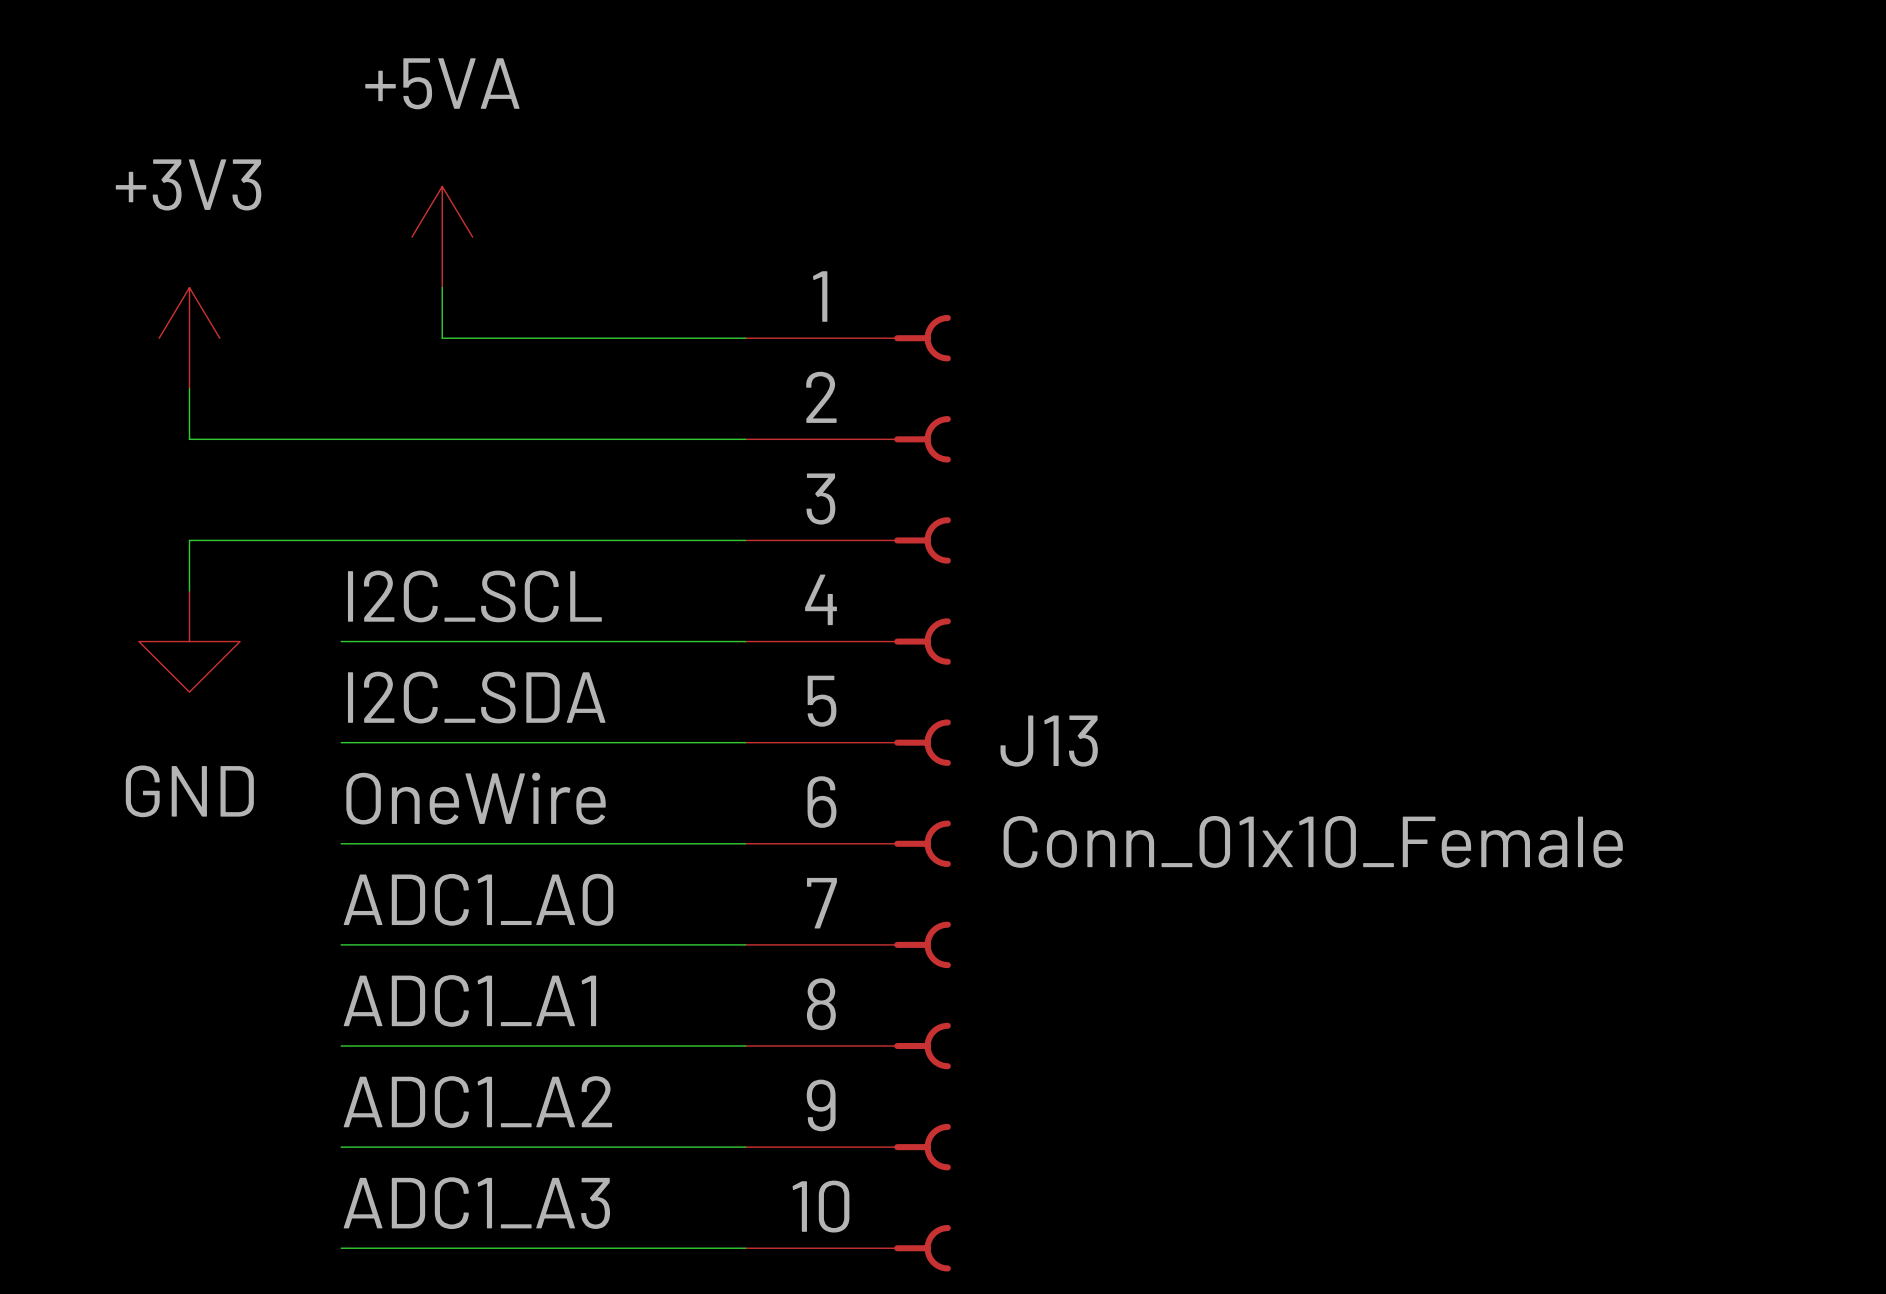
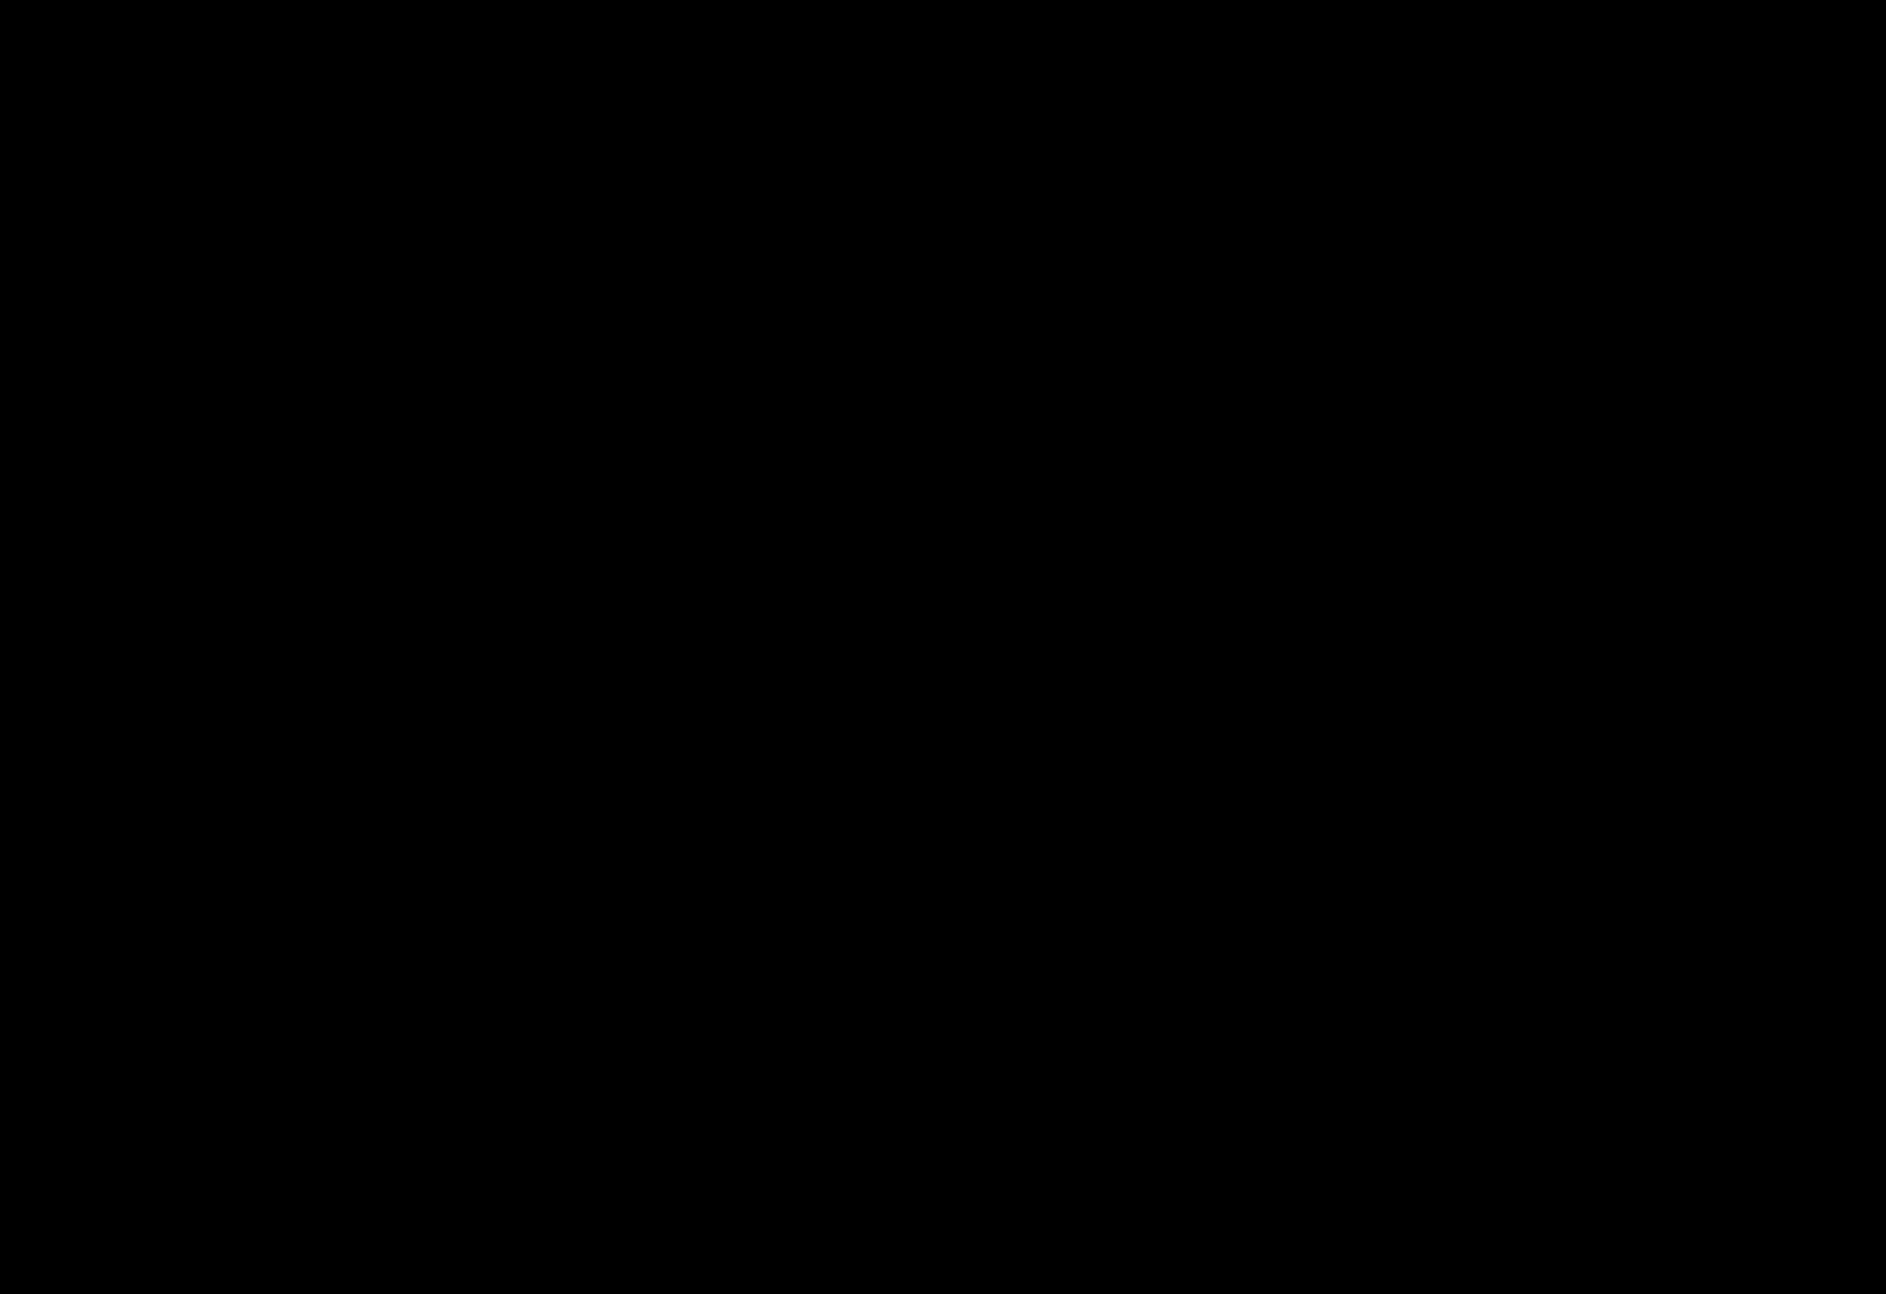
power symbol: +5VA (442, 237) -> none
wire: (442, 287) (442, 338) (745, 338) -> none
power symbol: +3V3 (189, 338) -> none
wire: (189, 388) (189, 439) (745, 439) -> none
wire: (745, 540) (189, 540) (189, 591) -> none
label: I2C_SCL (474, 596) -> none
power symbol: GND (189, 641) -> none
wire: (341, 641) (745, 641) -> none
label: I2C_SDA (476, 697) -> none
wire: (341, 742) (745, 742) -> none
J13: Conn_01x10_Female (848, 793) -> none
label: OneWire (476, 798) -> none
wire: (341, 843) (745, 843) -> none
label: ADC1_A0 (478, 899) -> none
wire: (341, 944) (745, 944) -> none
label: ADC1_A1 (469, 1000) -> none
wire: (341, 1046) (745, 1046) -> none
label: ADC1_A2 (477, 1102) -> none
wire: (341, 1147) (745, 1147) -> none
label: ADC1_A3 (476, 1203) -> none
wire: (341, 1248) (745, 1248) -> none

